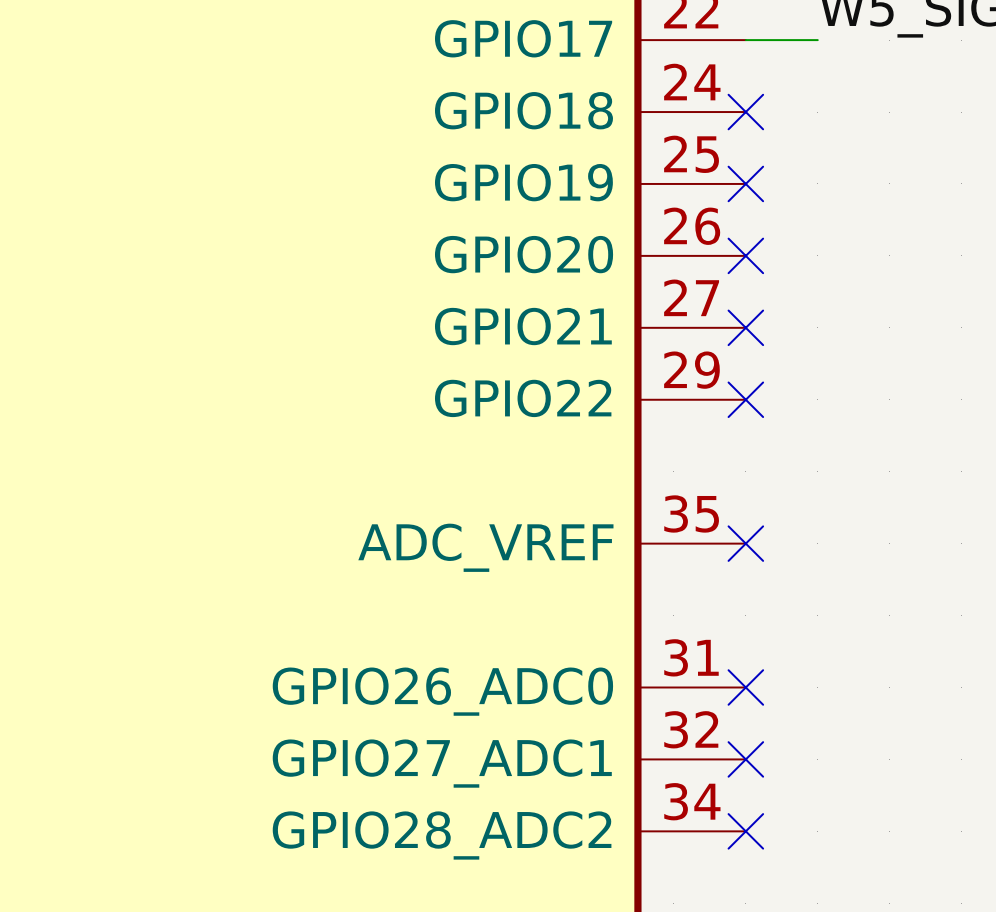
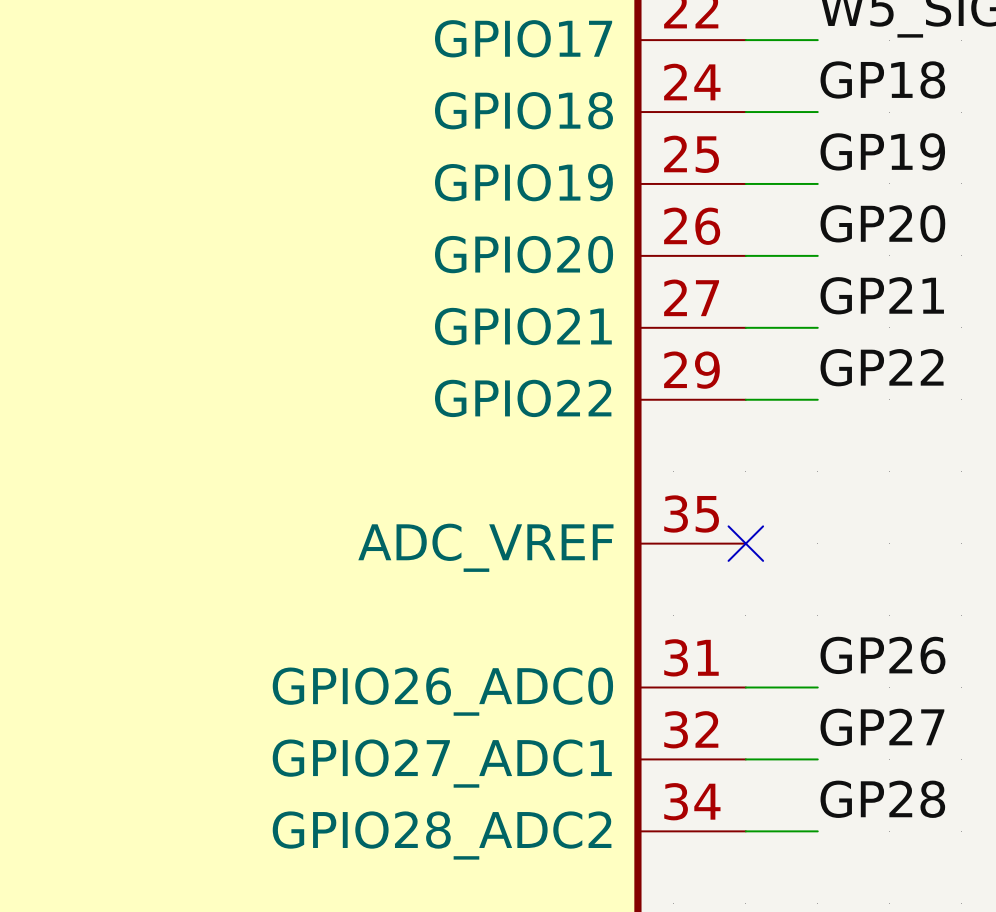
label: none -> GP18 (882, 79)
wire: none -> (745, 112) (817, 112)
no-connect mark: (745, 112) -> none
label: none -> GP19 (882, 151)
wire: none -> (745, 183) (817, 183)
no-connect mark: (745, 183) -> none
label: none -> GP20 (882, 223)
wire: none -> (745, 255) (817, 255)
no-connect mark: (745, 255) -> none
label: none -> GP21 (882, 295)
wire: none -> (745, 327) (817, 327)
no-connect mark: (745, 327) -> none
label: none -> GP22 (882, 367)
wire: none -> (745, 399) (817, 399)
no-connect mark: (745, 399) -> none
label: none -> GP26 (882, 655)
wire: none -> (745, 687) (817, 687)
no-connect mark: (745, 687) -> none
label: none -> GP27 (882, 727)
wire: none -> (745, 759) (817, 759)
no-connect mark: (745, 759) -> none
label: none -> GP28 (882, 799)
wire: none -> (745, 831) (817, 831)
no-connect mark: (745, 831) -> none

